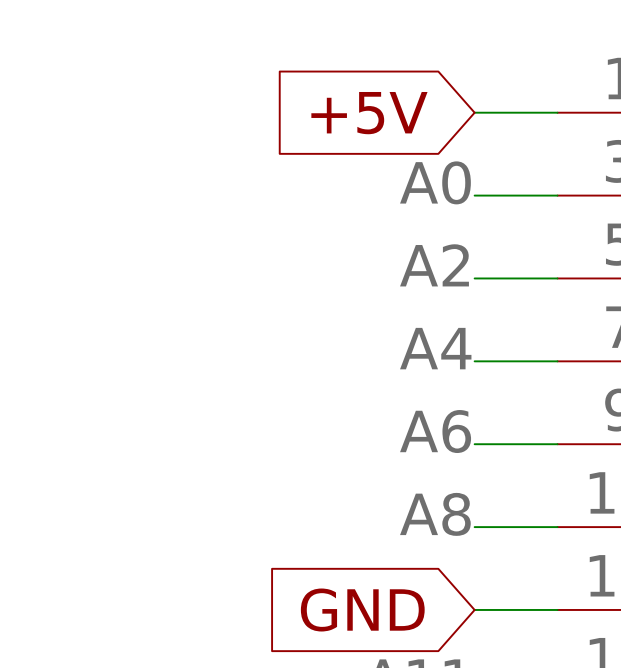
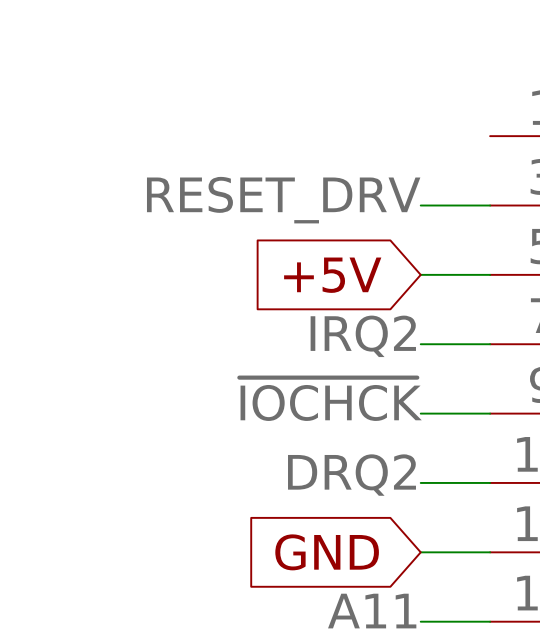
wire: (474, 112) (557, 112) -> none
global label position: +5V (369, 113) -> +5V (332, 275)
label: A0 (435, 182) -> RESET_DRV (283, 200)
label: A2 (434, 265) -> none
label: A4 (435, 348) -> IRQ2 (363, 336)
label: A6 (435, 431) -> ~{IOCHCK} (330, 399)
label: A8 (435, 514) -> DRQ2 (352, 475)

